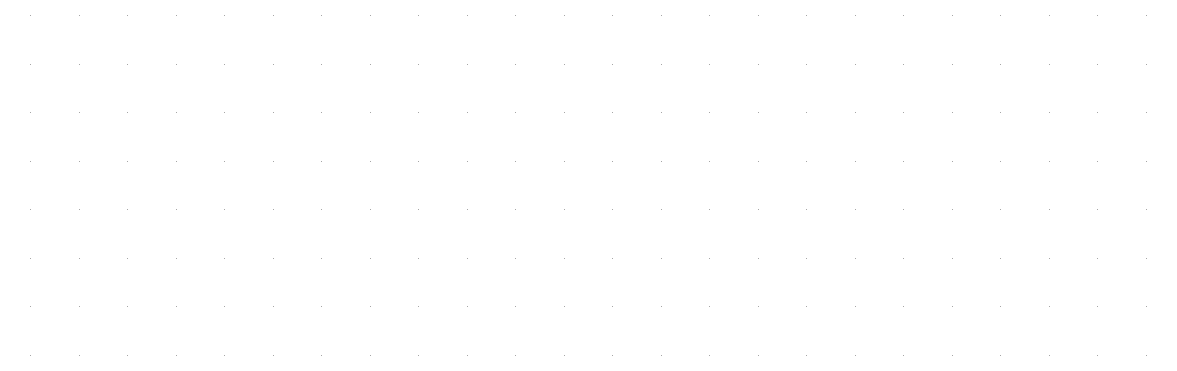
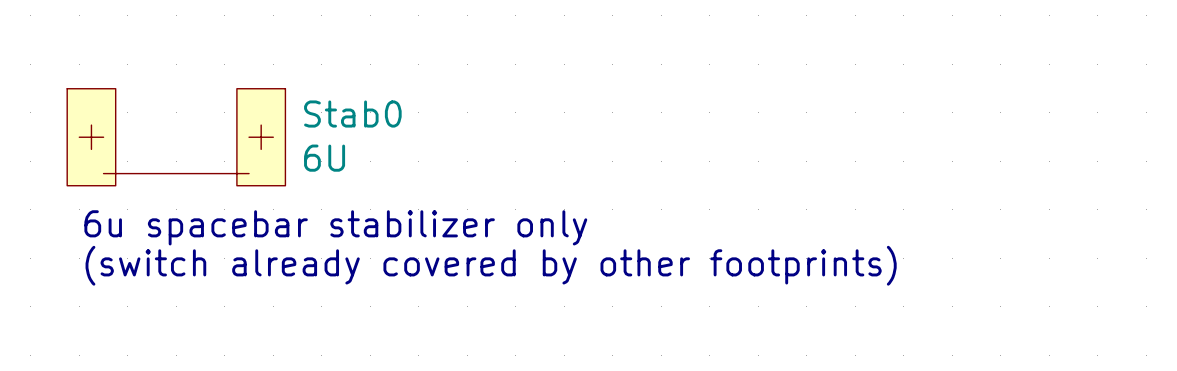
Stab0: none -> 6U (176, 137)
text: none -> 6u spacebar stabilizer only (335, 227)
text: none -> (switch already covered by other footprints) (491, 265)

